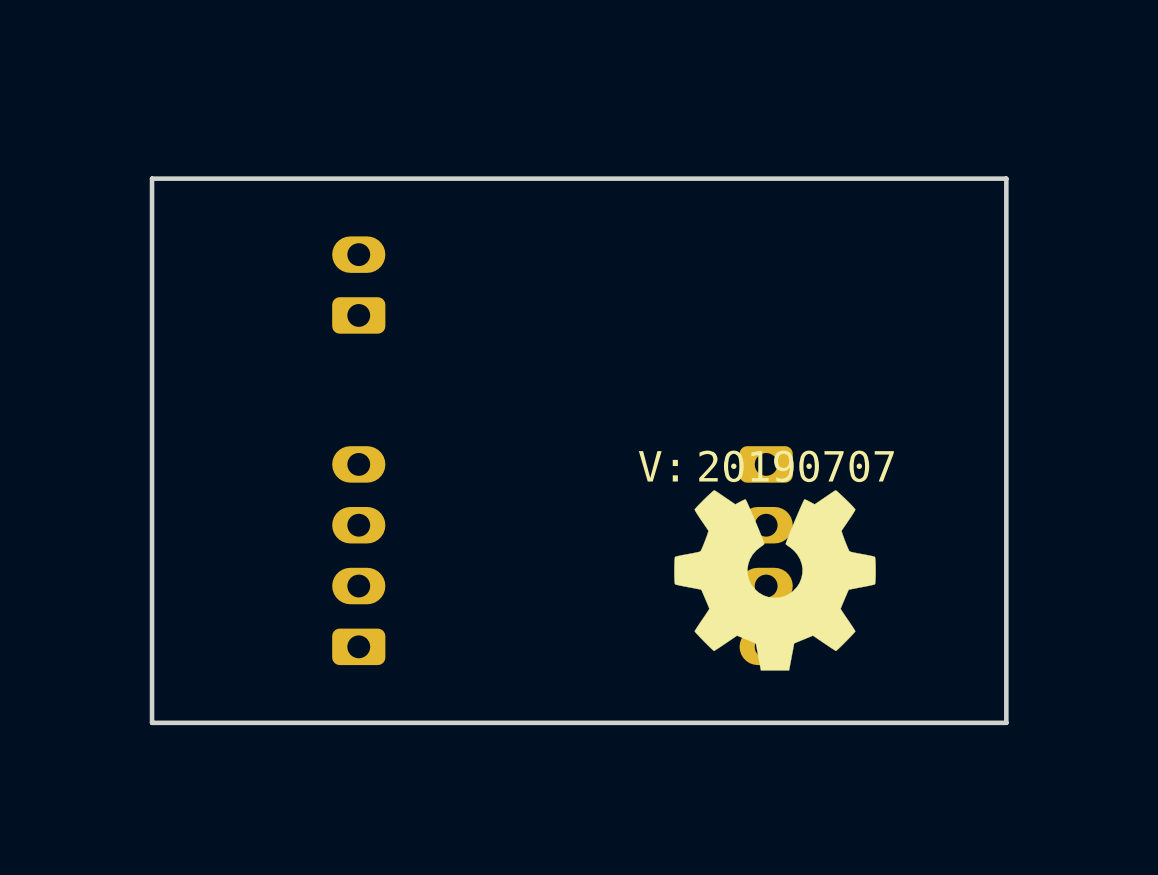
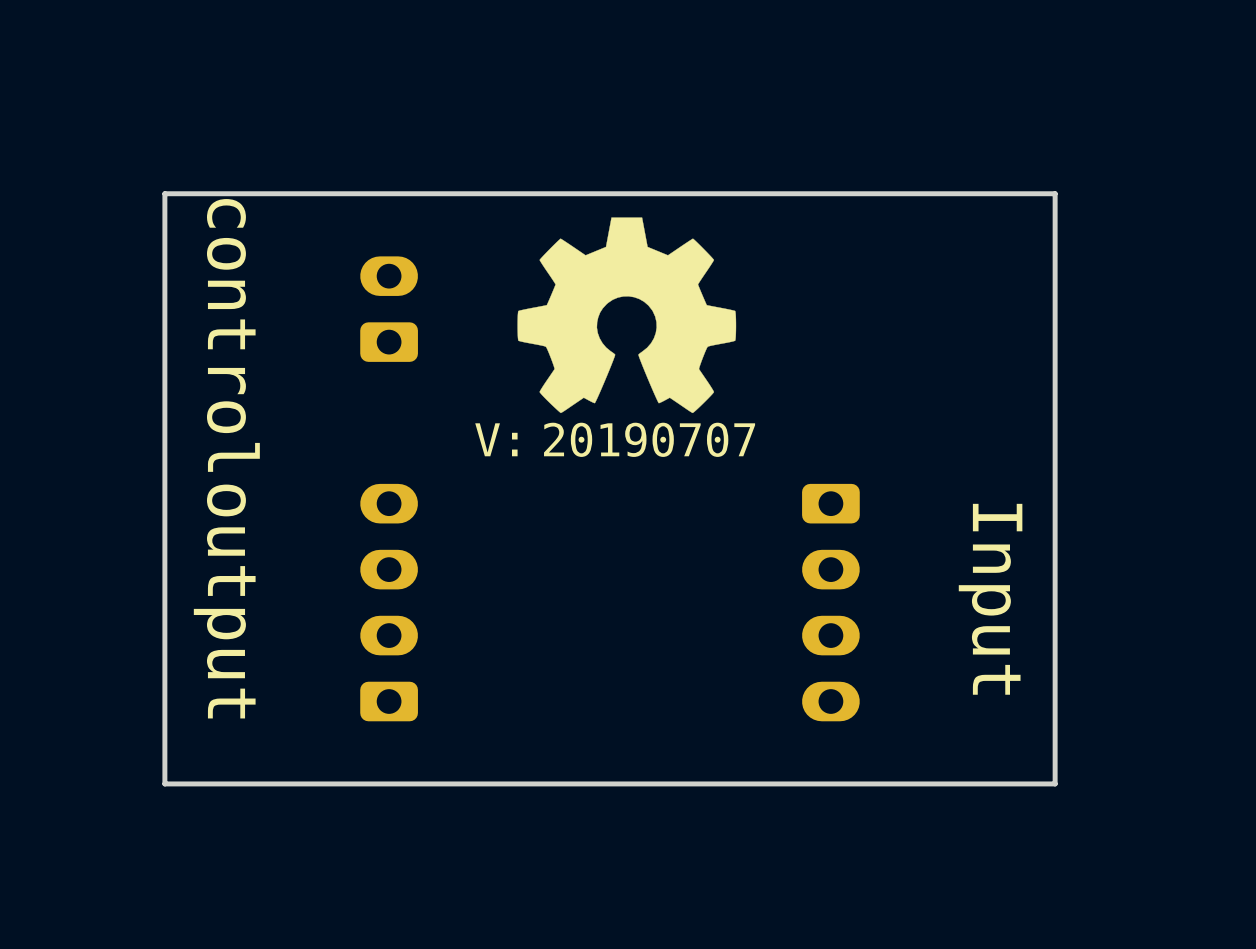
board edge: (972, 178) (1006, 178) (1006, 722) (972, 722) -> (1055, 193) (1055, 783)
drawing: none -> [517, 217, 737, 414]
text: none -> control (233, 335)
drawing: [674, 490, 876, 671] -> none
text: none -> Input (990, 599)
text: none -> output (224, 601)

